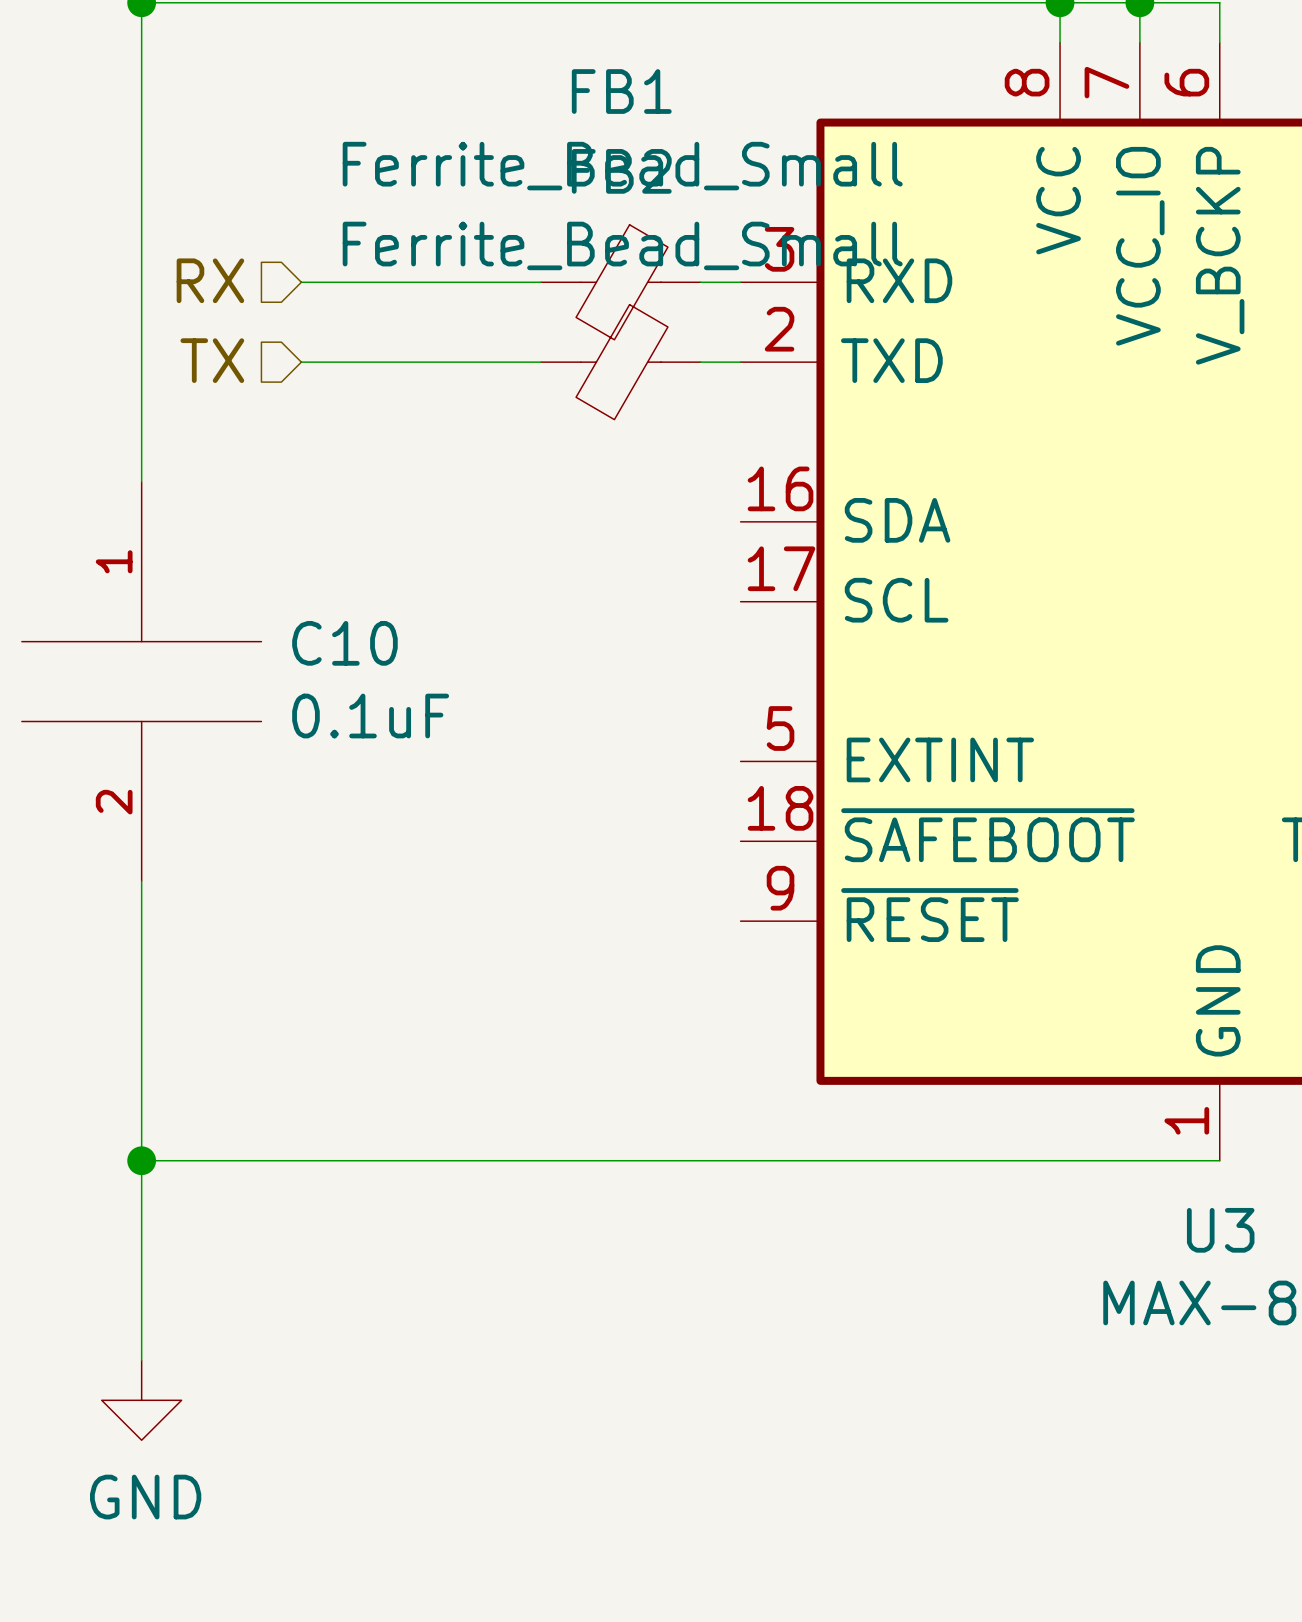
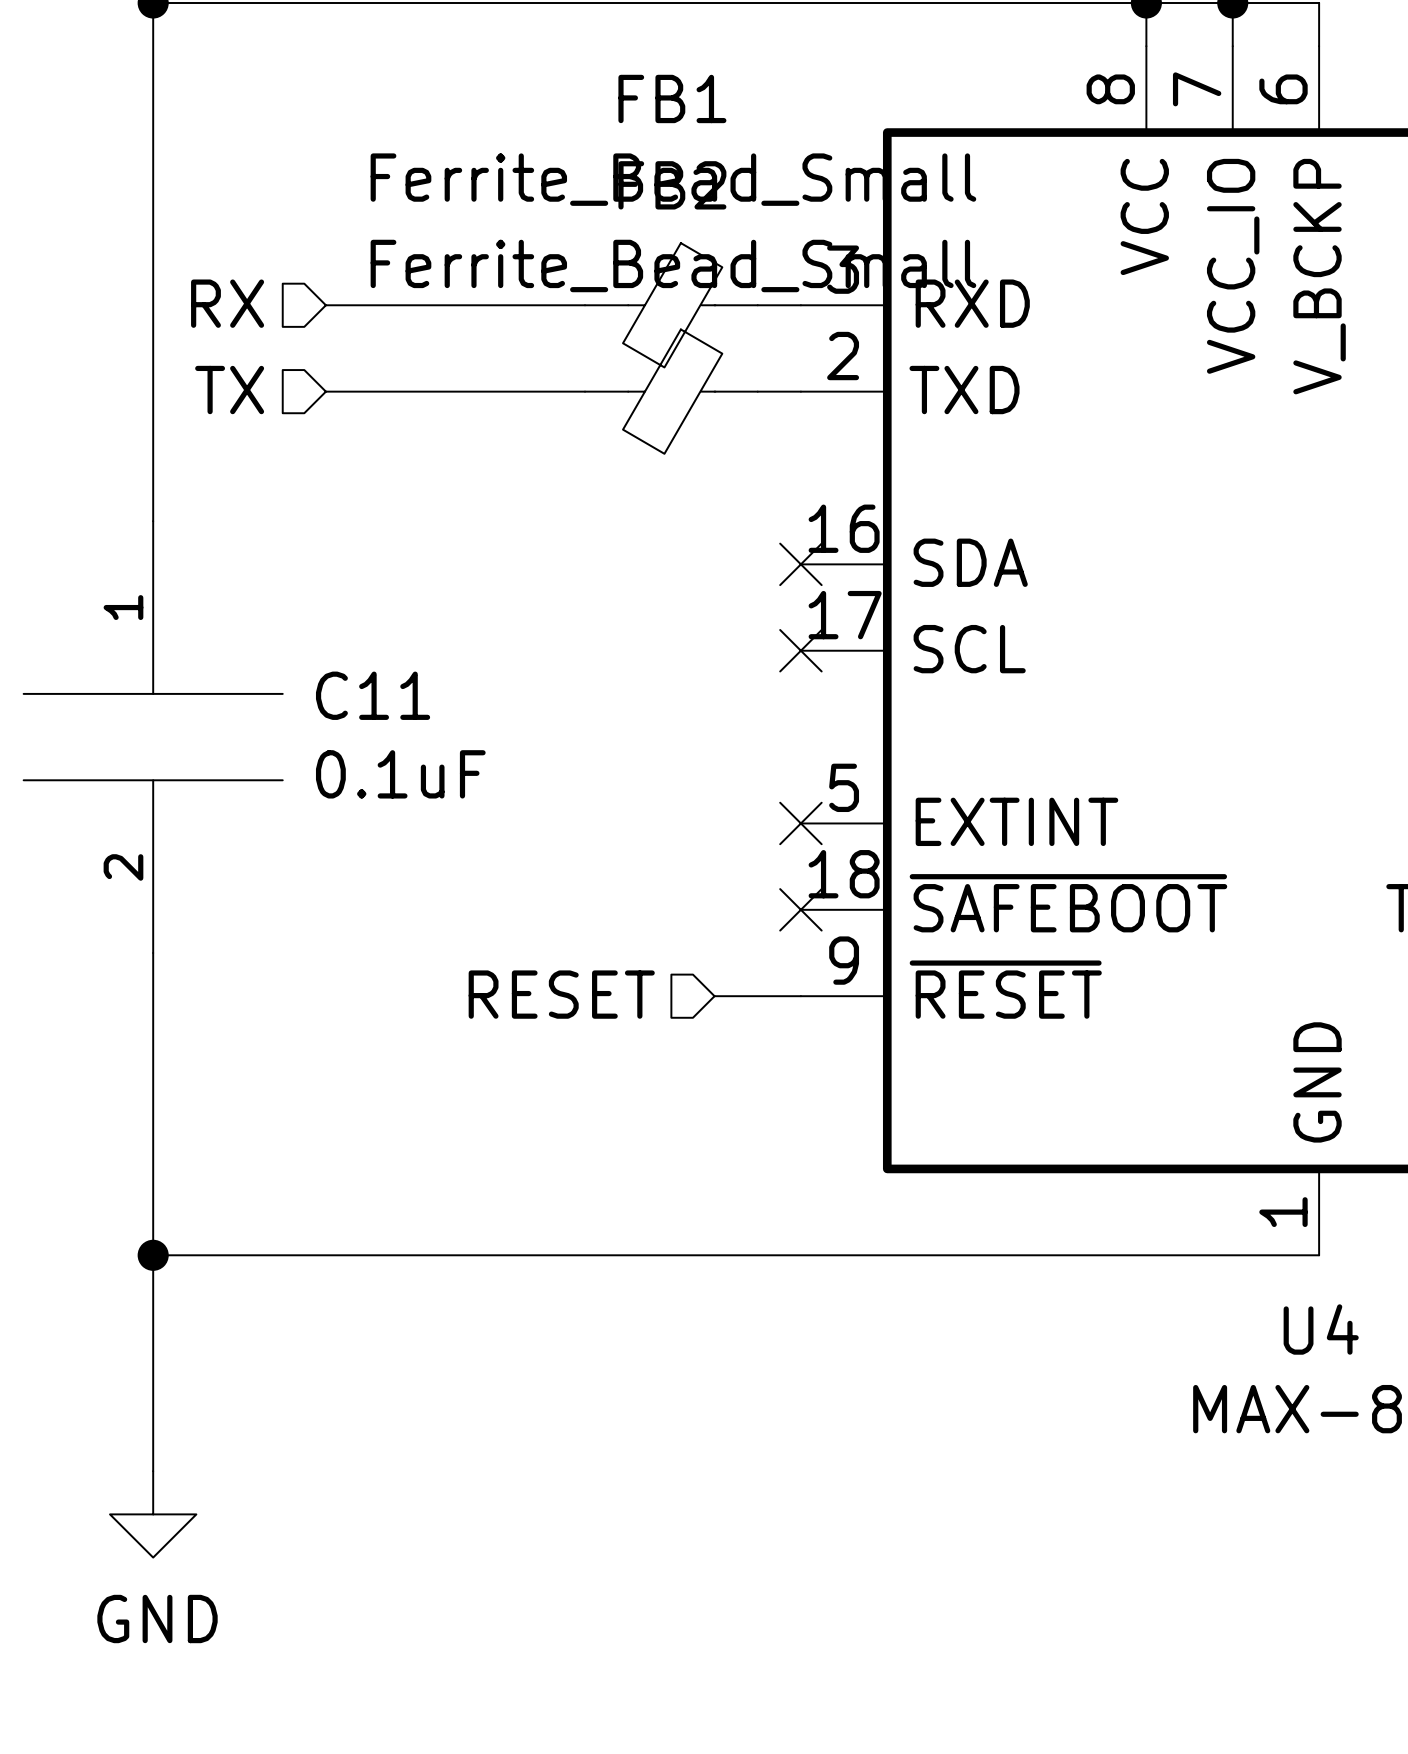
no-connect mark: none -> (800, 564)
no-connect mark: none -> (800, 650)
C10 name: C10 (344, 643) -> C11 (373, 695)
no-connect mark: none -> (800, 823)
no-connect mark: none -> (800, 909)
hierarchical label: none -> RESET (561, 994)
wire: none -> (714, 996) (800, 996)
U3 name: U3 (1220, 1230) -> U4 (1321, 1329)

